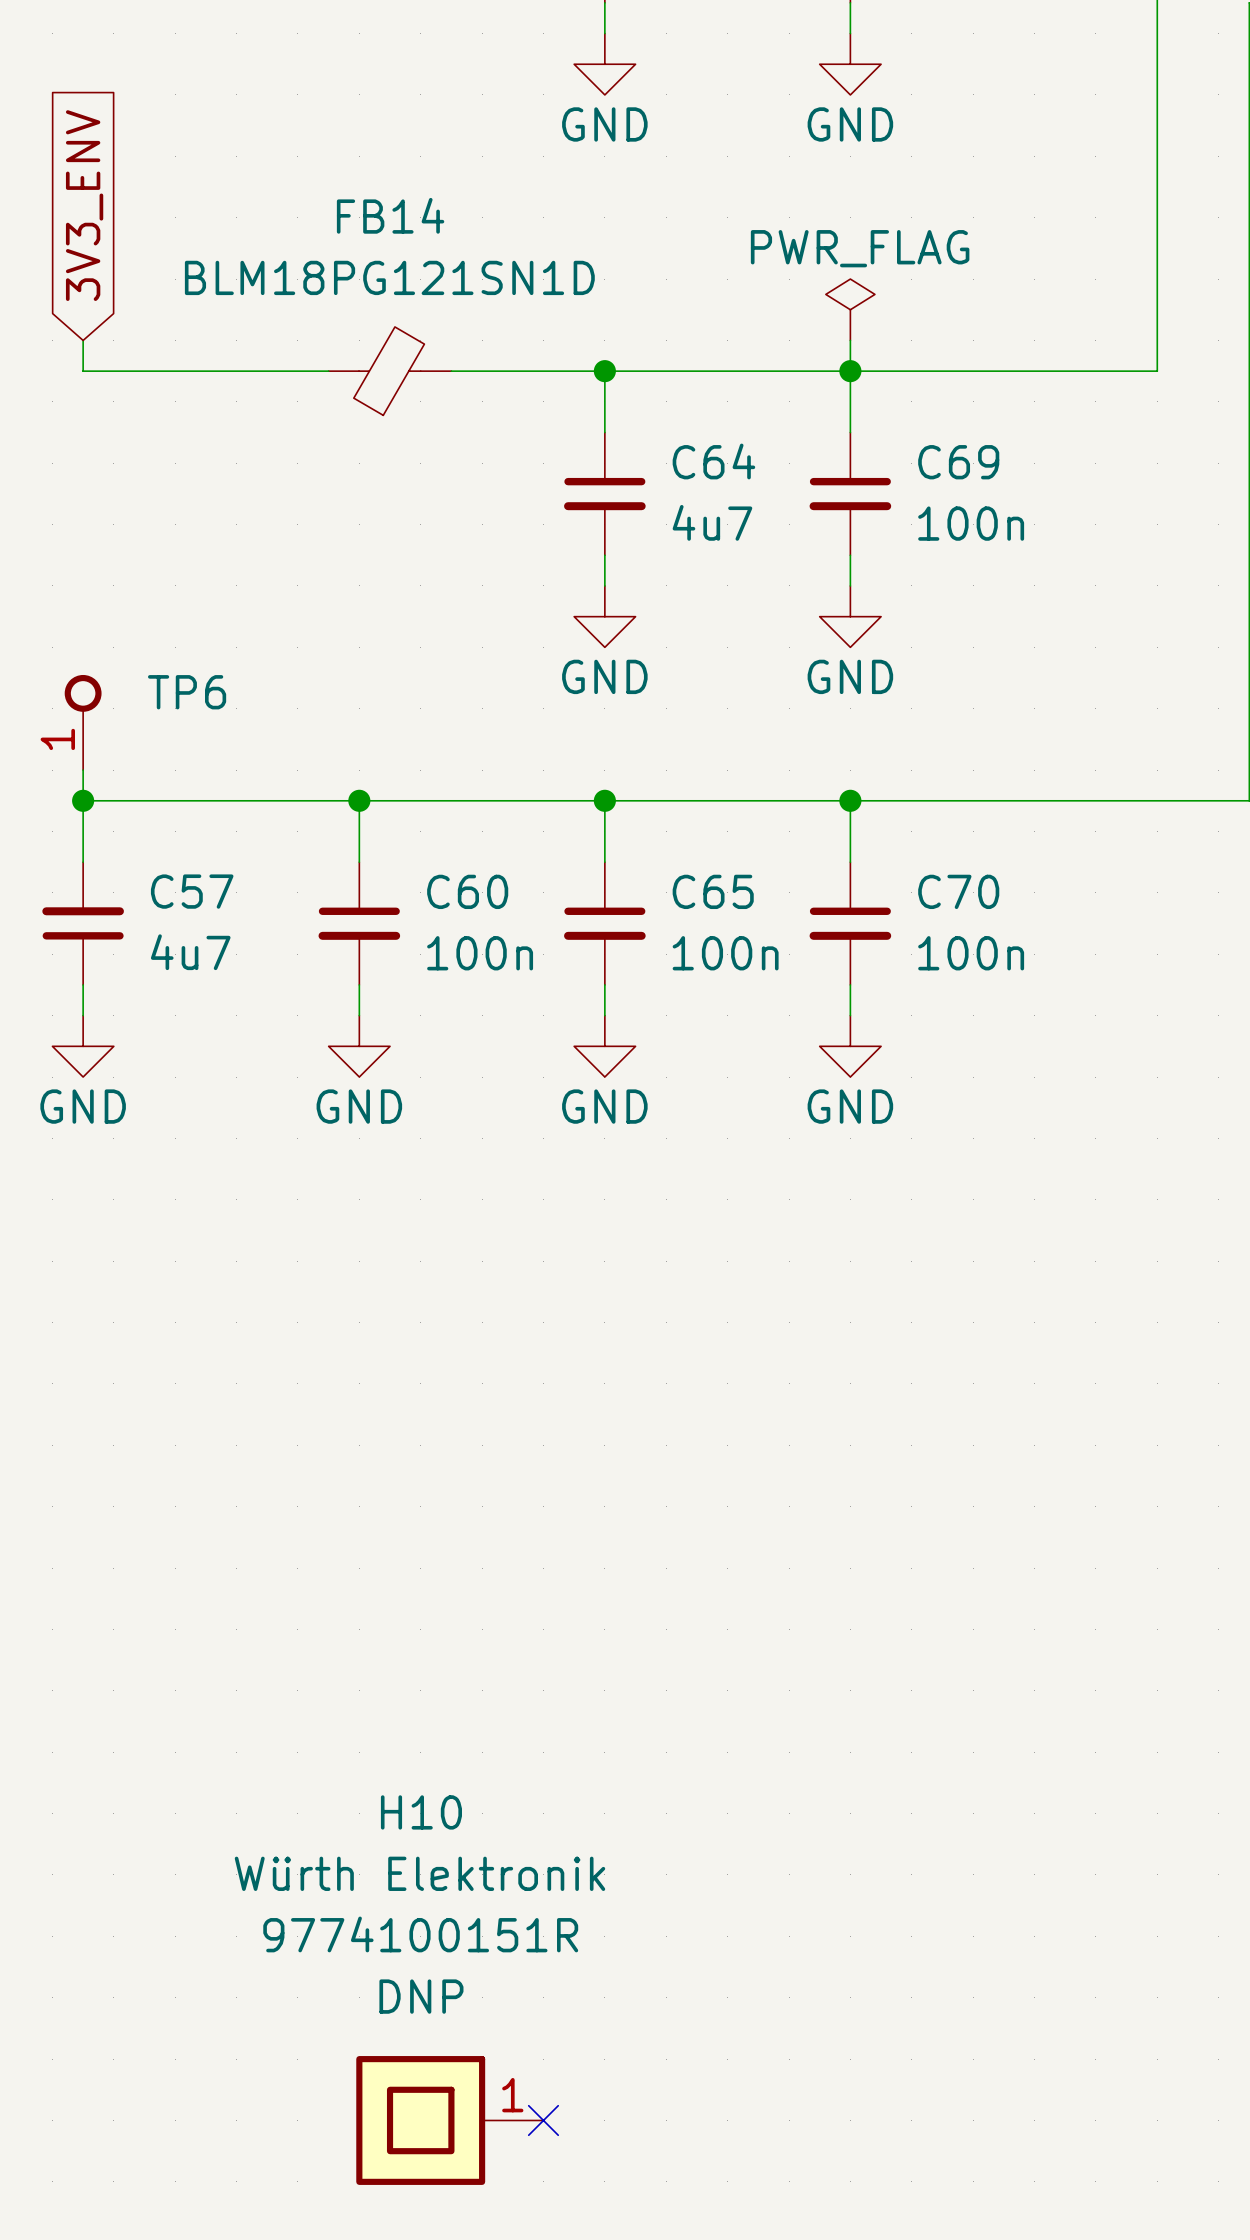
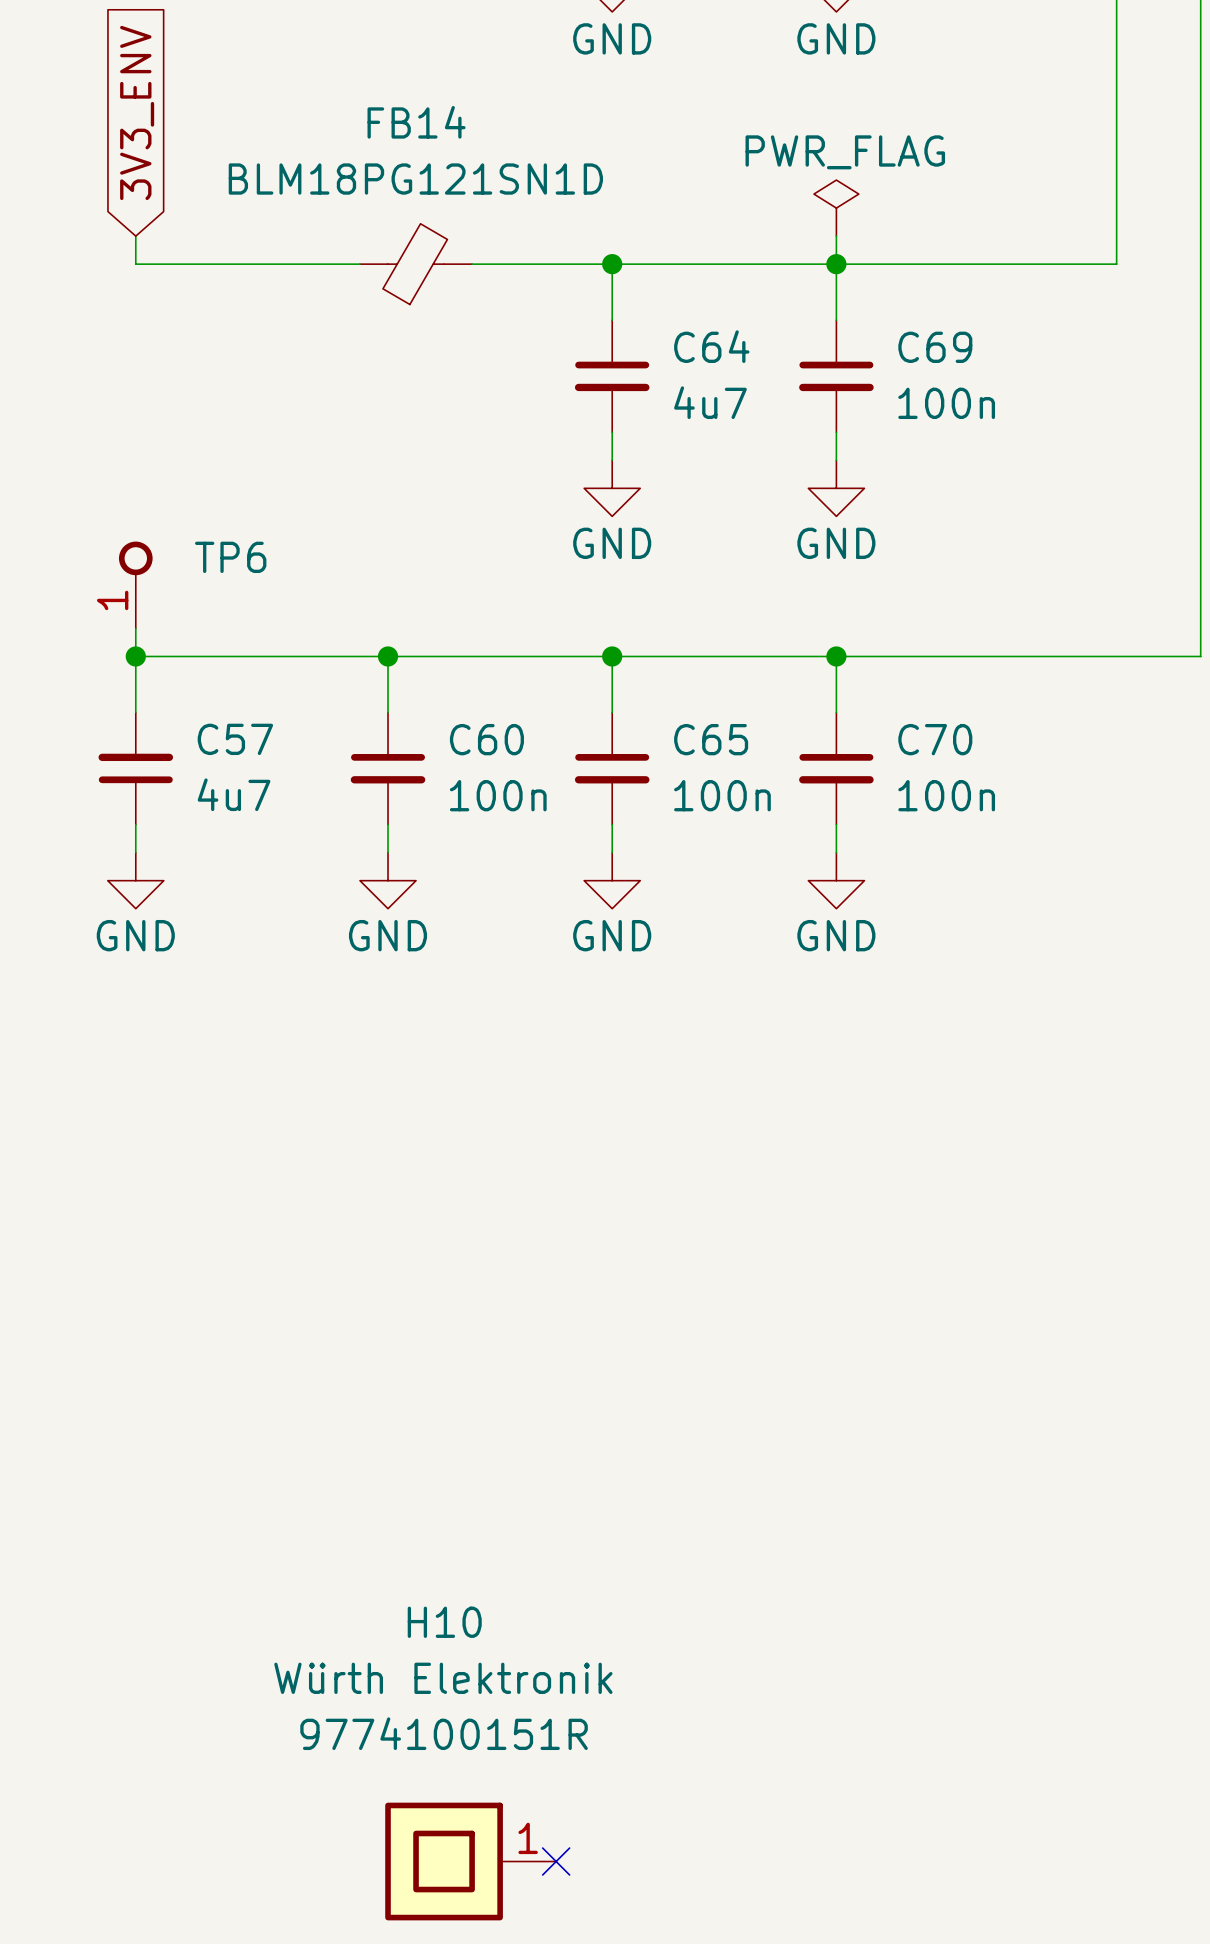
H10 name position: H10 (421, 1812) -> H10 (444, 1622)
H10 text position: Würth Elektronik (419, 1873) -> Würth Elektronik (443, 1678)
H10 text position: 9774100151R (420, 1934) -> 9774100151R (444, 1733)
H10 text: DNP (421, 1996) -> none

